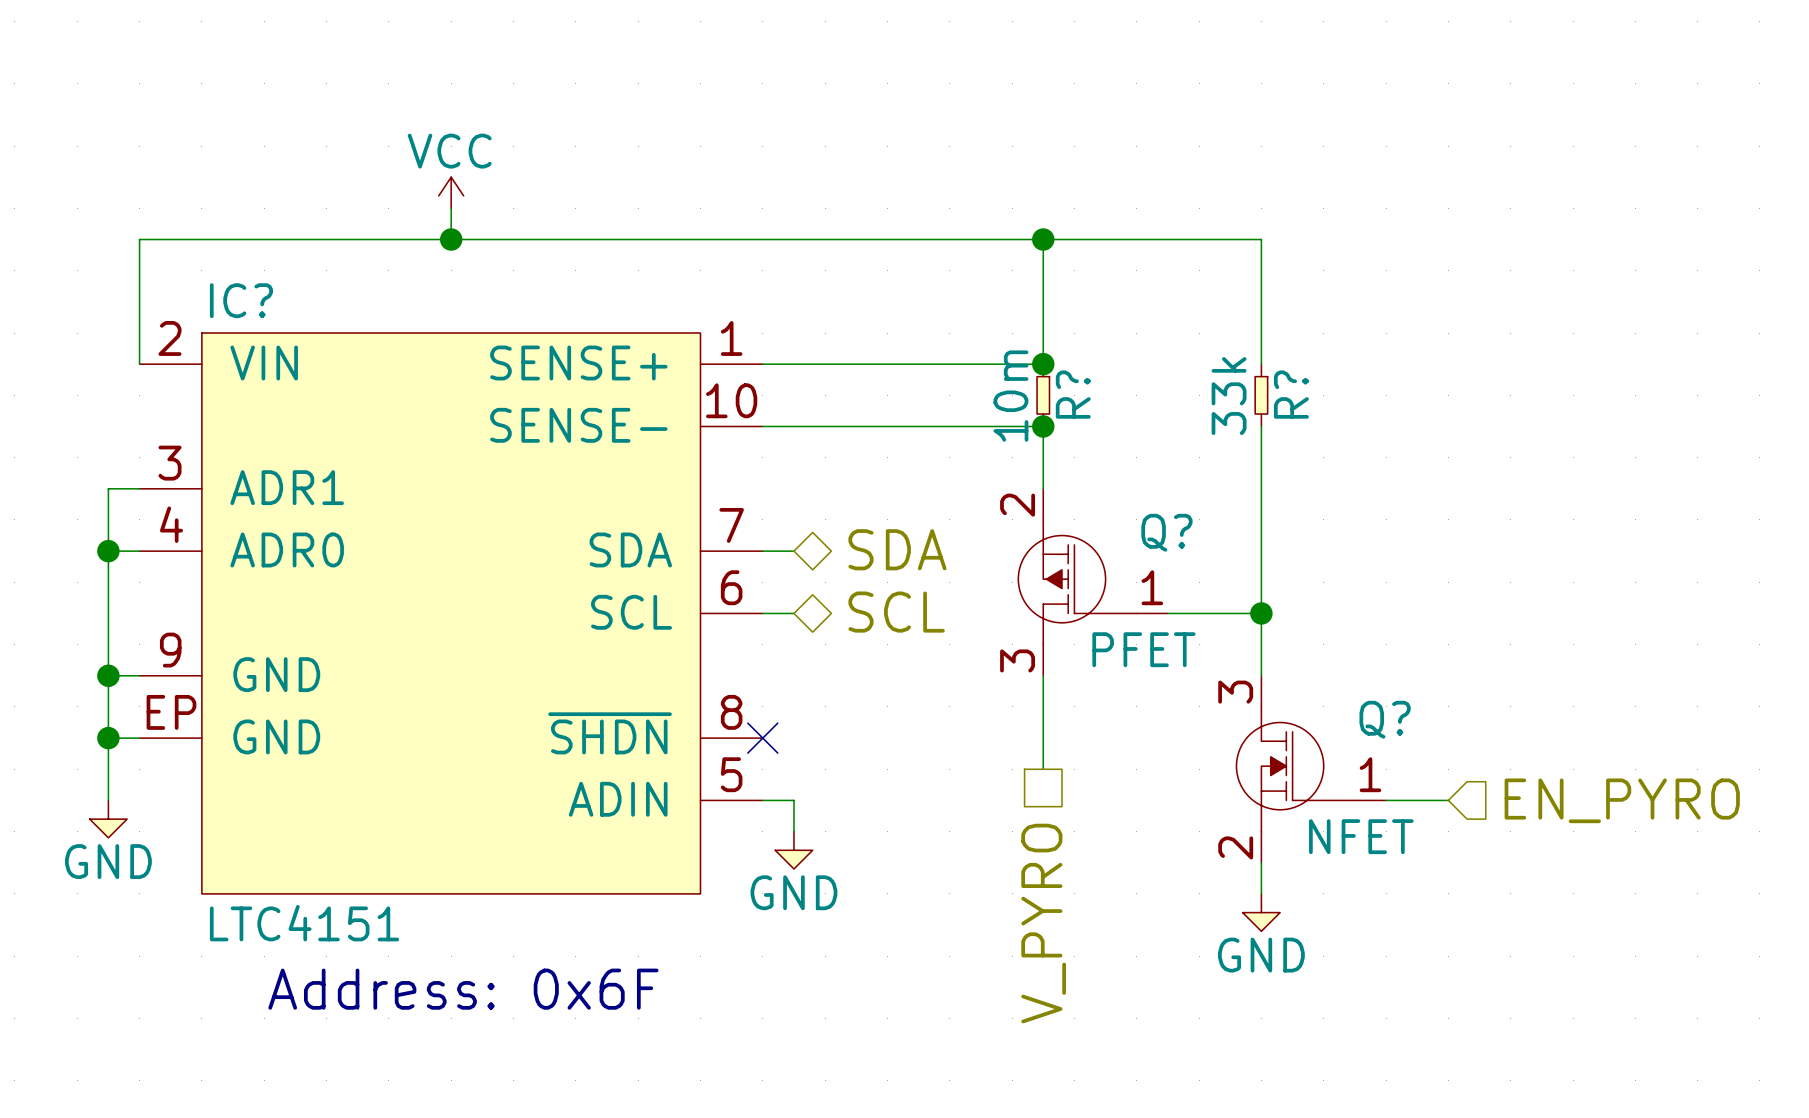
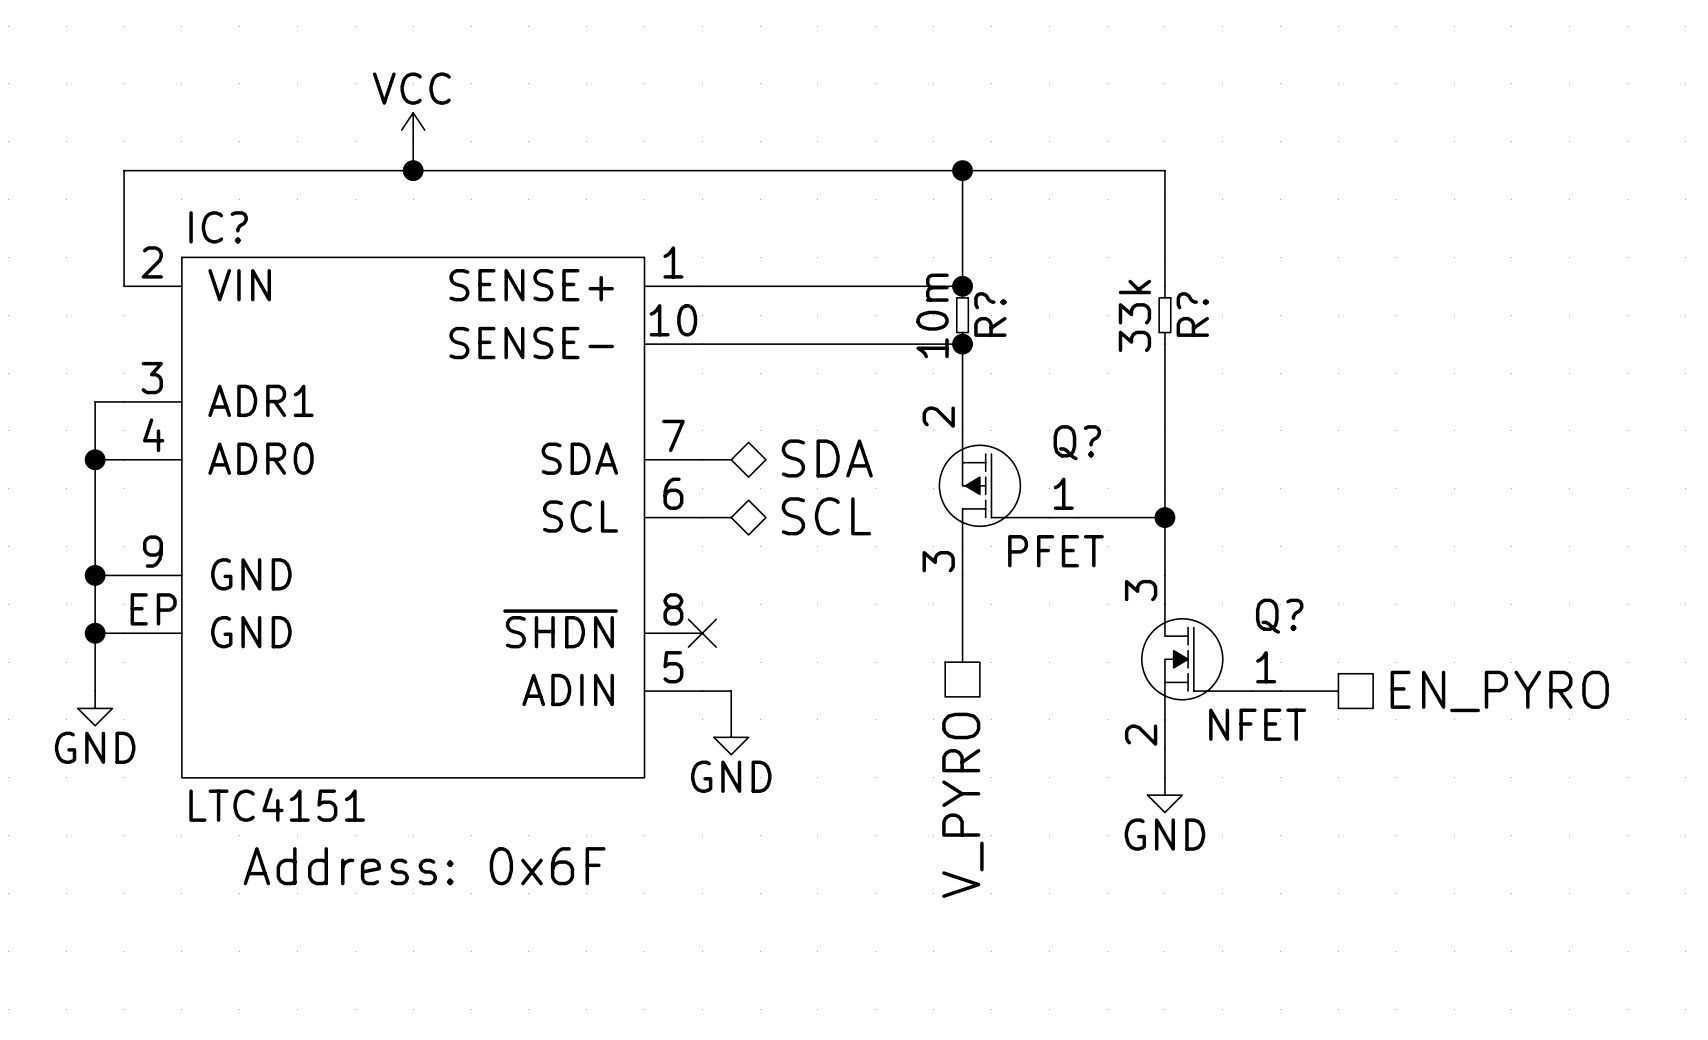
hierarchical label shape: input (1622, 800) -> passive (1499, 691)

